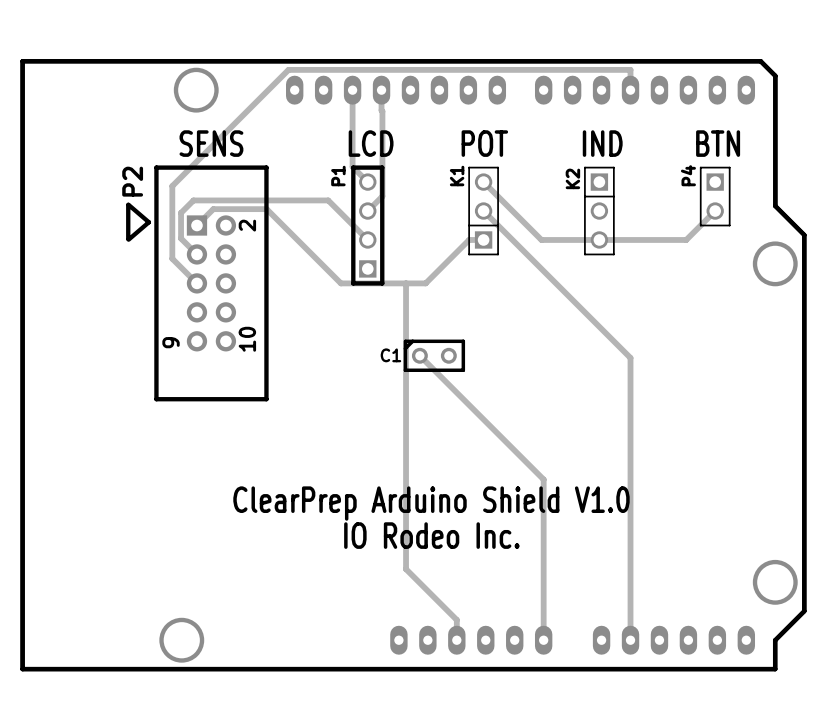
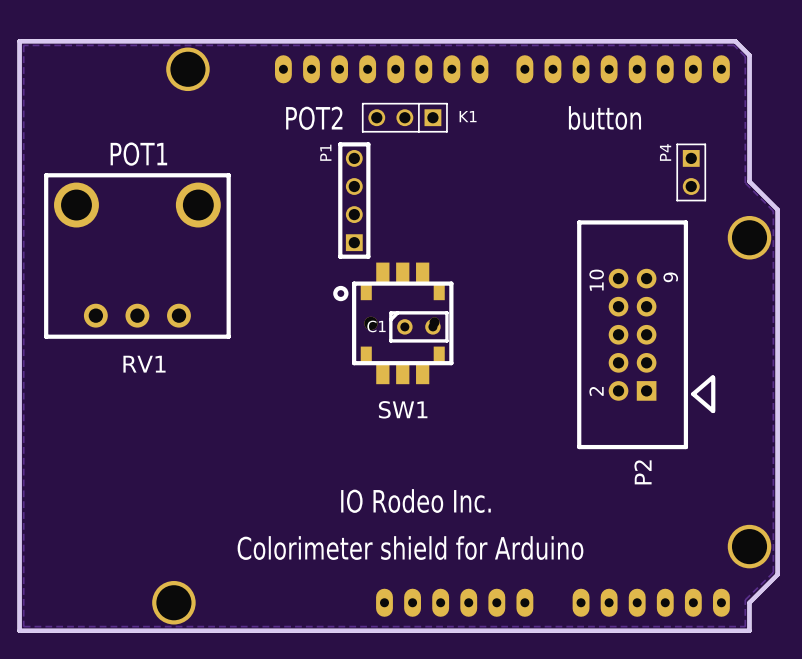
zone outline: none -> (23, 45) (734, 45) (745, 56) (745, 182) (773, 211) (773, 572) (745, 599) (745, 626) (23, 626) (23, 45)
track: (352, 90) (352, 166) (367, 182) -> none
track: (381, 90) (382, 196) (367, 211) -> none
track: (630, 90) (630, 69) (288, 69) (172, 186) (172, 258) (196, 283) -> none
text: none -> POT2 (314, 118)
text: none -> button (604, 118)
text: SENS (211, 143) -> none
text: LCD (371, 143) -> none
text: POT (484, 143) -> none
text: IND (602, 143) -> none
text: BTN (718, 143) -> none
K1 name position: K1 (457, 176) -> K1 (468, 116)
text: none -> POT1 (138, 154)
P2 name position: P2 (132, 181) -> P2 (643, 472)
track: (483, 182) (541, 239) (686, 239) (715, 211) -> none
track: (483, 211) (630, 357) (630, 640) -> none
K1 rotation: 0° (483, 211) -> 90° counterclockwise (404, 117)
K1 position: (483, 211) -> (404, 117)
K2: (599, 211) -> none
track: (196, 225) (213, 209) (266, 209) (340, 283) (425, 283) (469, 239) (483, 239) -> none
track: (367, 239) (328, 200) (193, 200) (181, 212) (181, 238) (196, 254) -> none
RV1: none -> (137, 256)
P2 rotation: 0° (197, 283) -> 180° (646, 334)
P2 position: (197, 283) -> (646, 334)
track: (406, 283) (406, 569) (456, 619) (456, 640) -> none
SW1: none -> (393, 323)
track: (419, 355) (543, 479) (543, 640) -> none
text: ClearPrep Arduino Shield V1.0 (431, 503) -> none
text: none -> Colorimeter shield for Arduino (410, 548)

